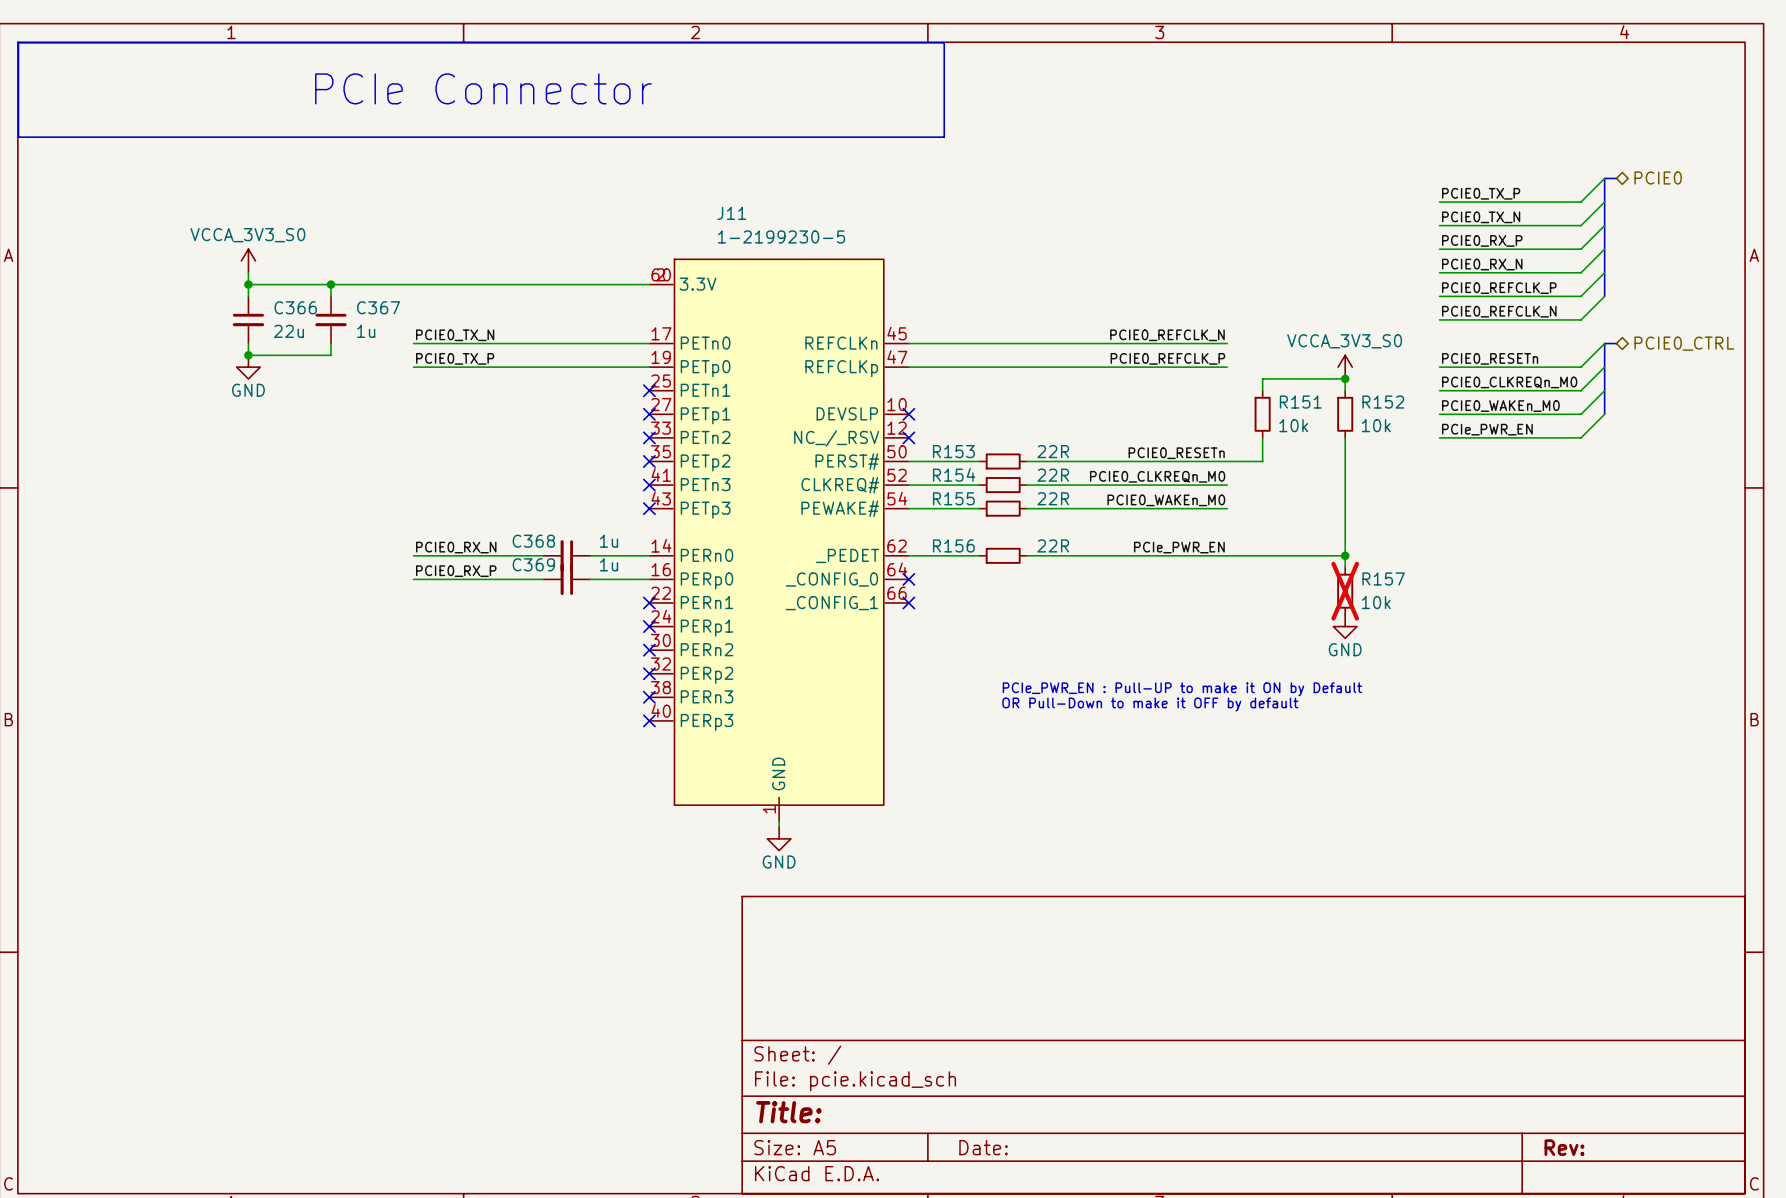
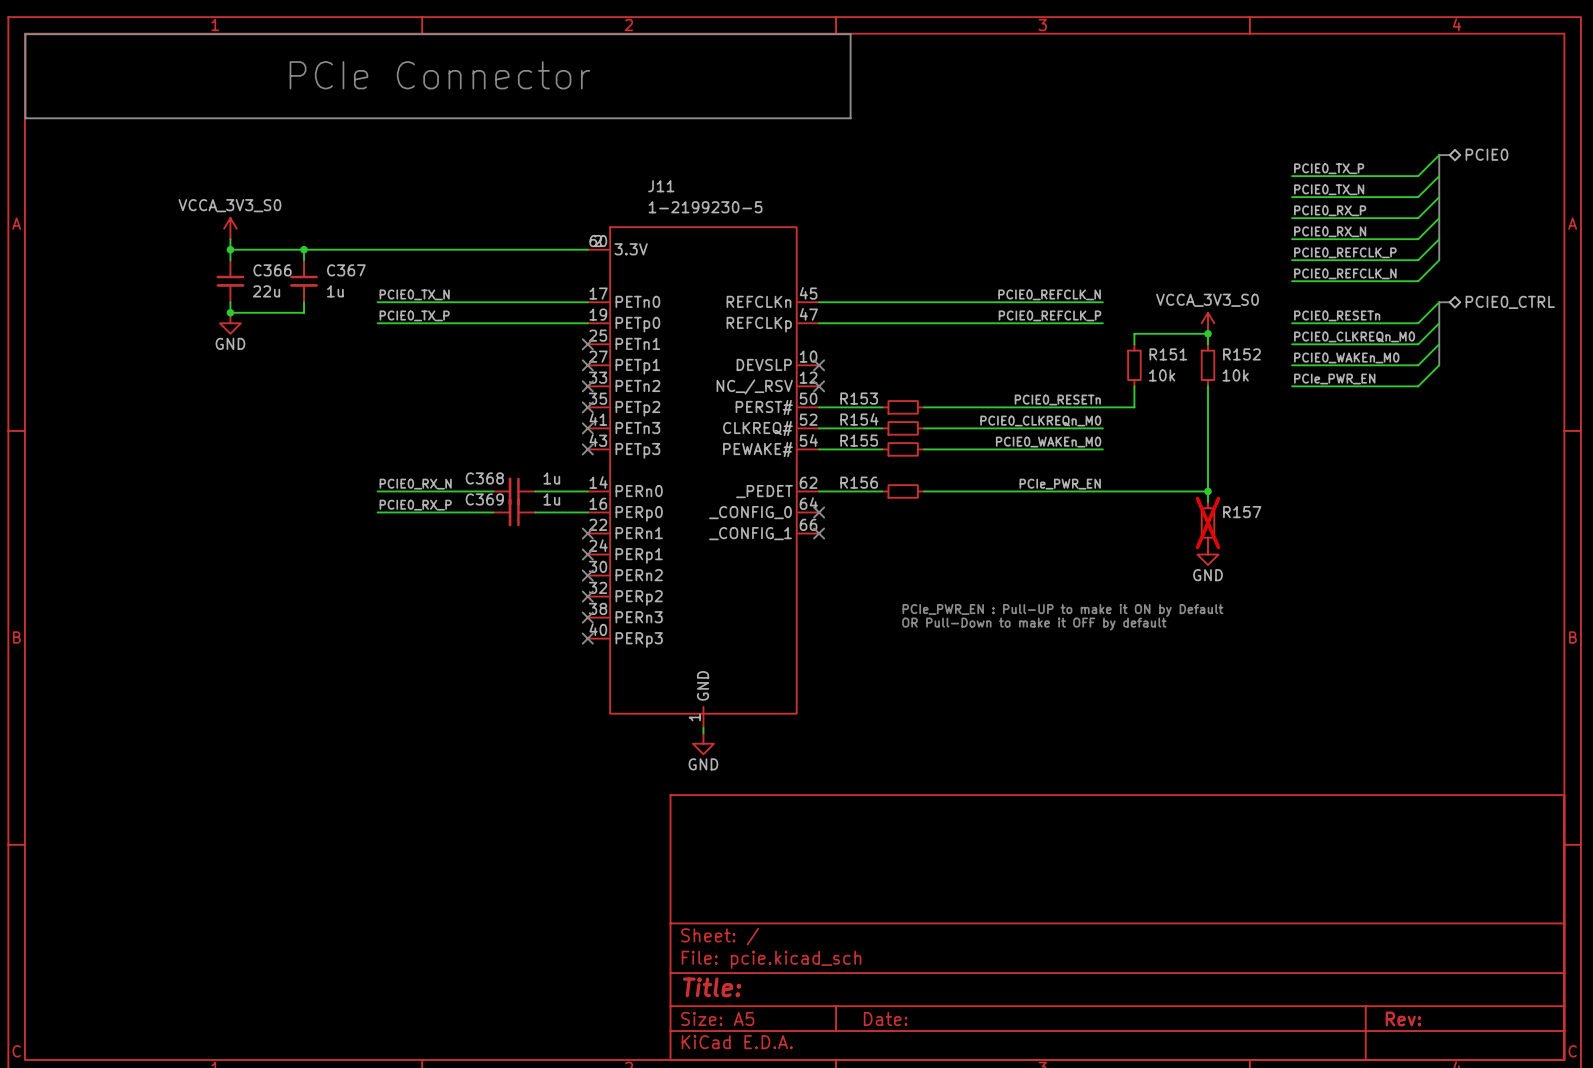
R153 value: 22R (1053, 451) -> none
R154 value: 22R (1053, 475) -> none
R155 value: 22R (1053, 498) -> none
R156 value: 22R (1053, 545) -> none
R157 value: 10k (1376, 602) -> none

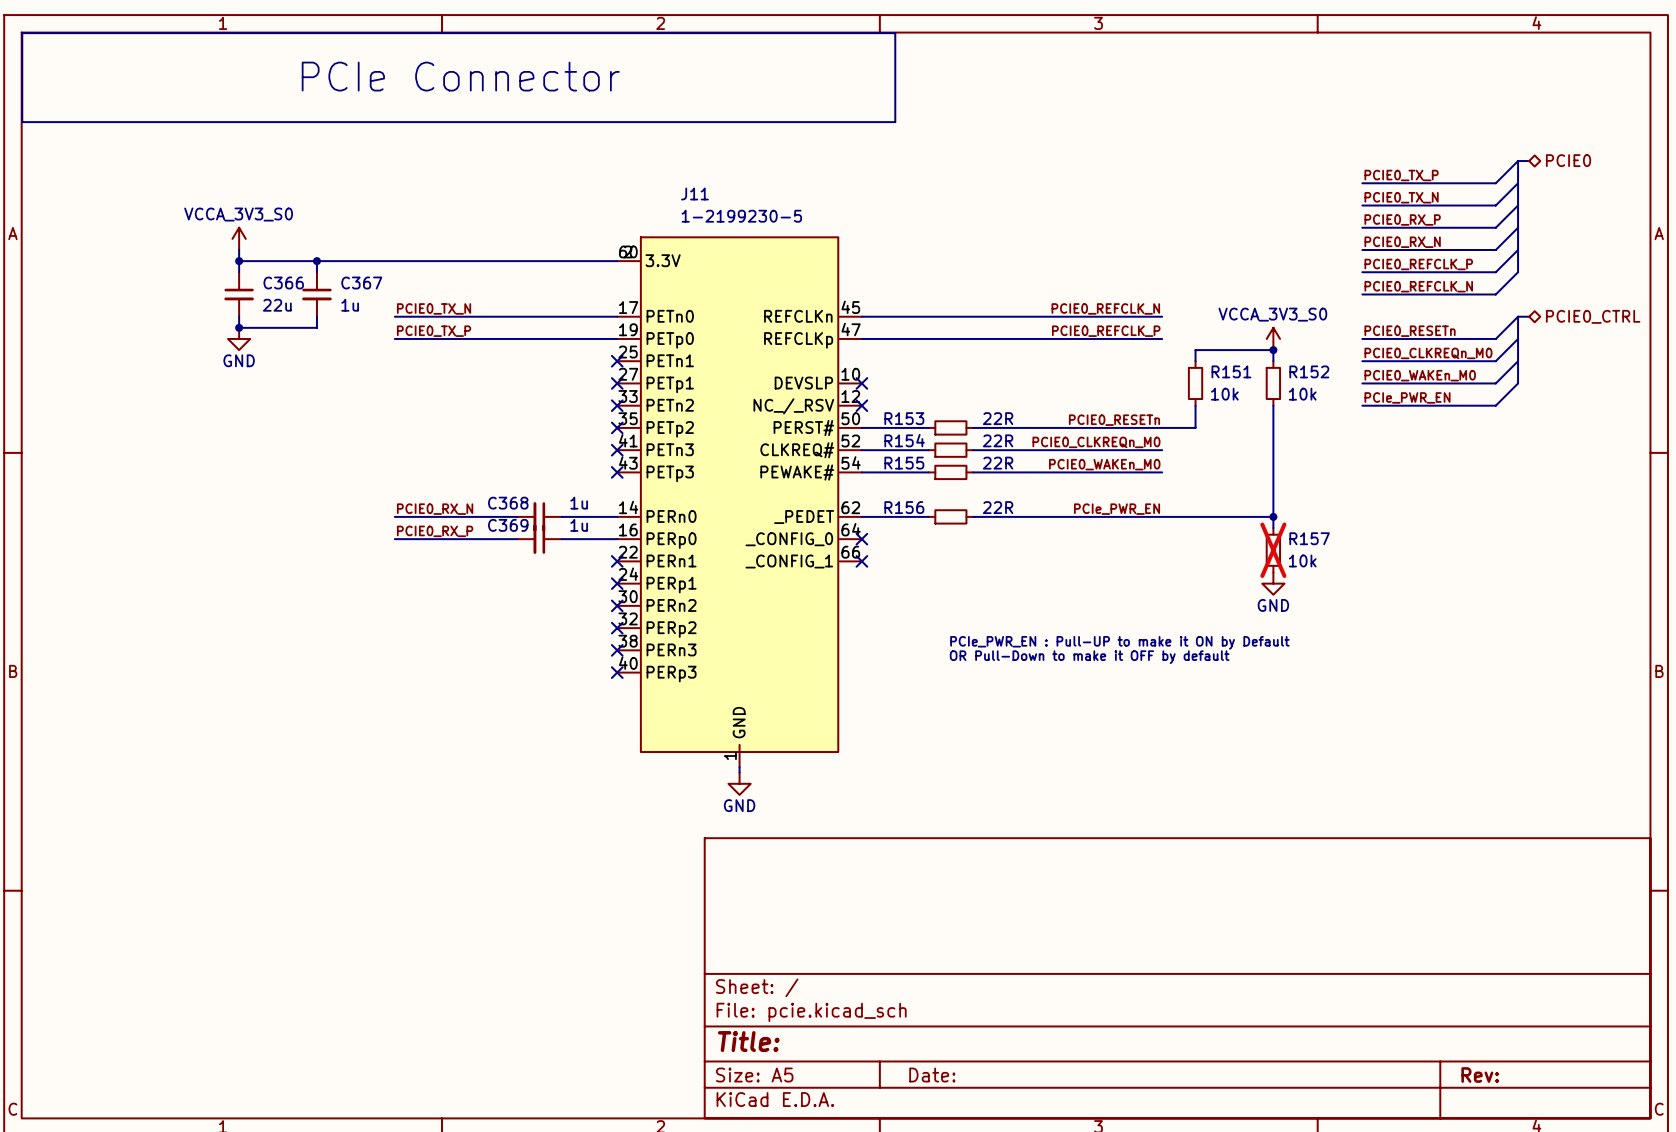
R153 value: none -> 22R (998, 418)
R154 value: none -> 22R (998, 440)
R155 value: none -> 22R (998, 463)
R156 value: none -> 22R (998, 507)
R157 value: none -> 10k (1302, 560)

